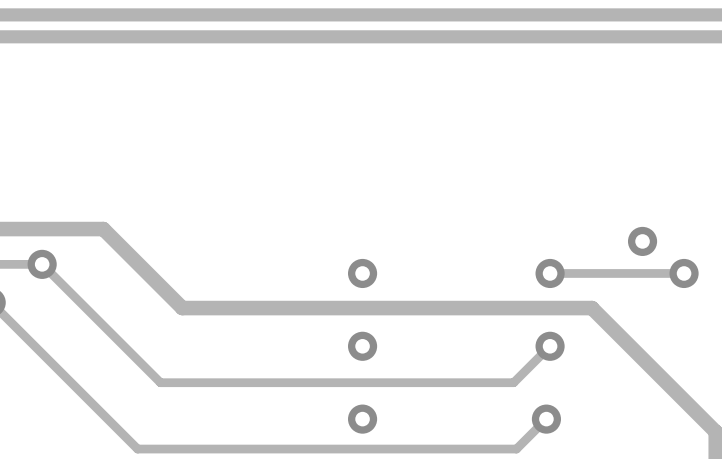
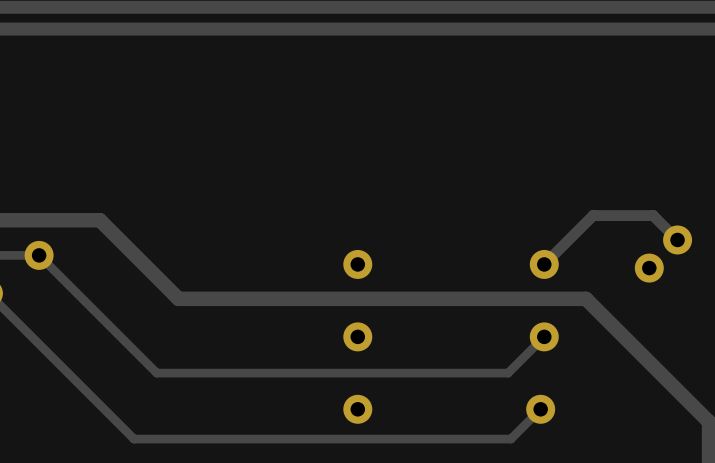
via: (642, 241) -> none
via: none -> (677, 239)
track: (684, 273) (550, 273) -> (677, 239) (653, 215) (593, 215) (544, 264)
via: (684, 273) -> none
via: none -> (649, 268)

